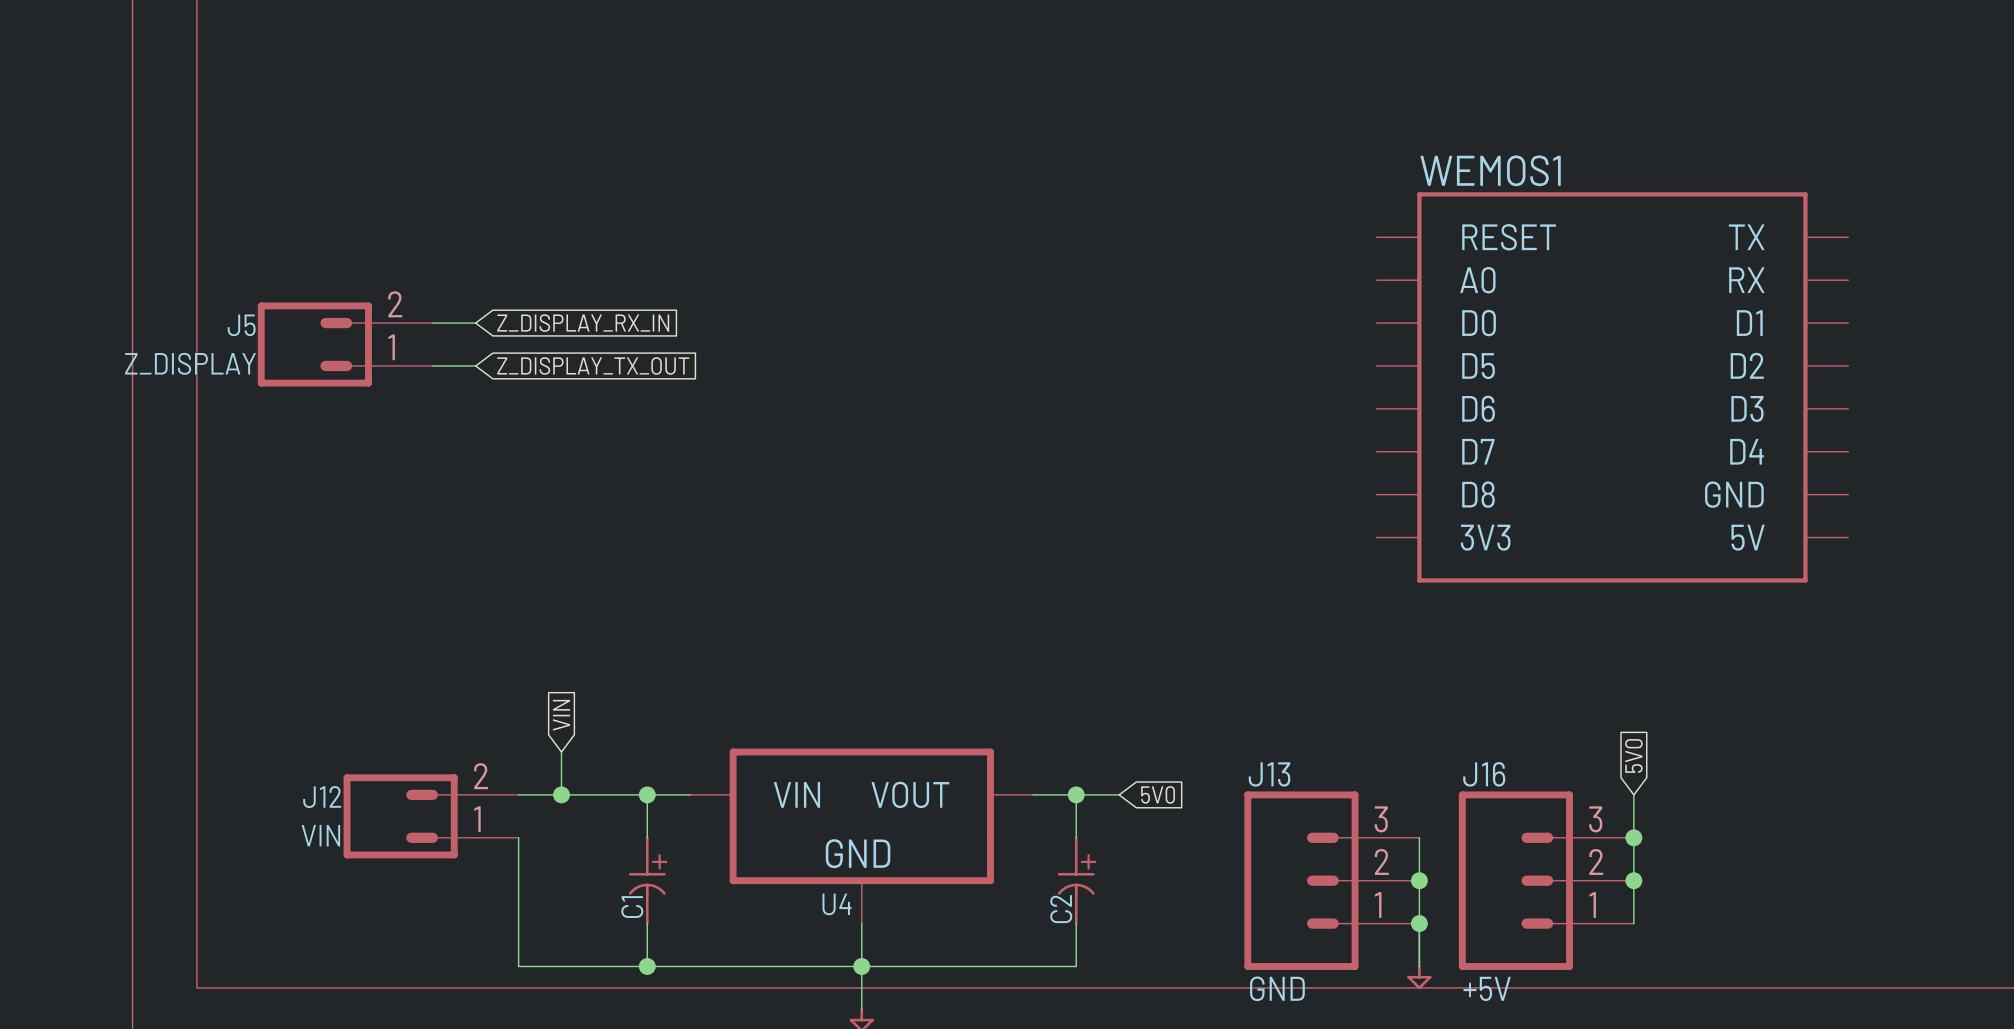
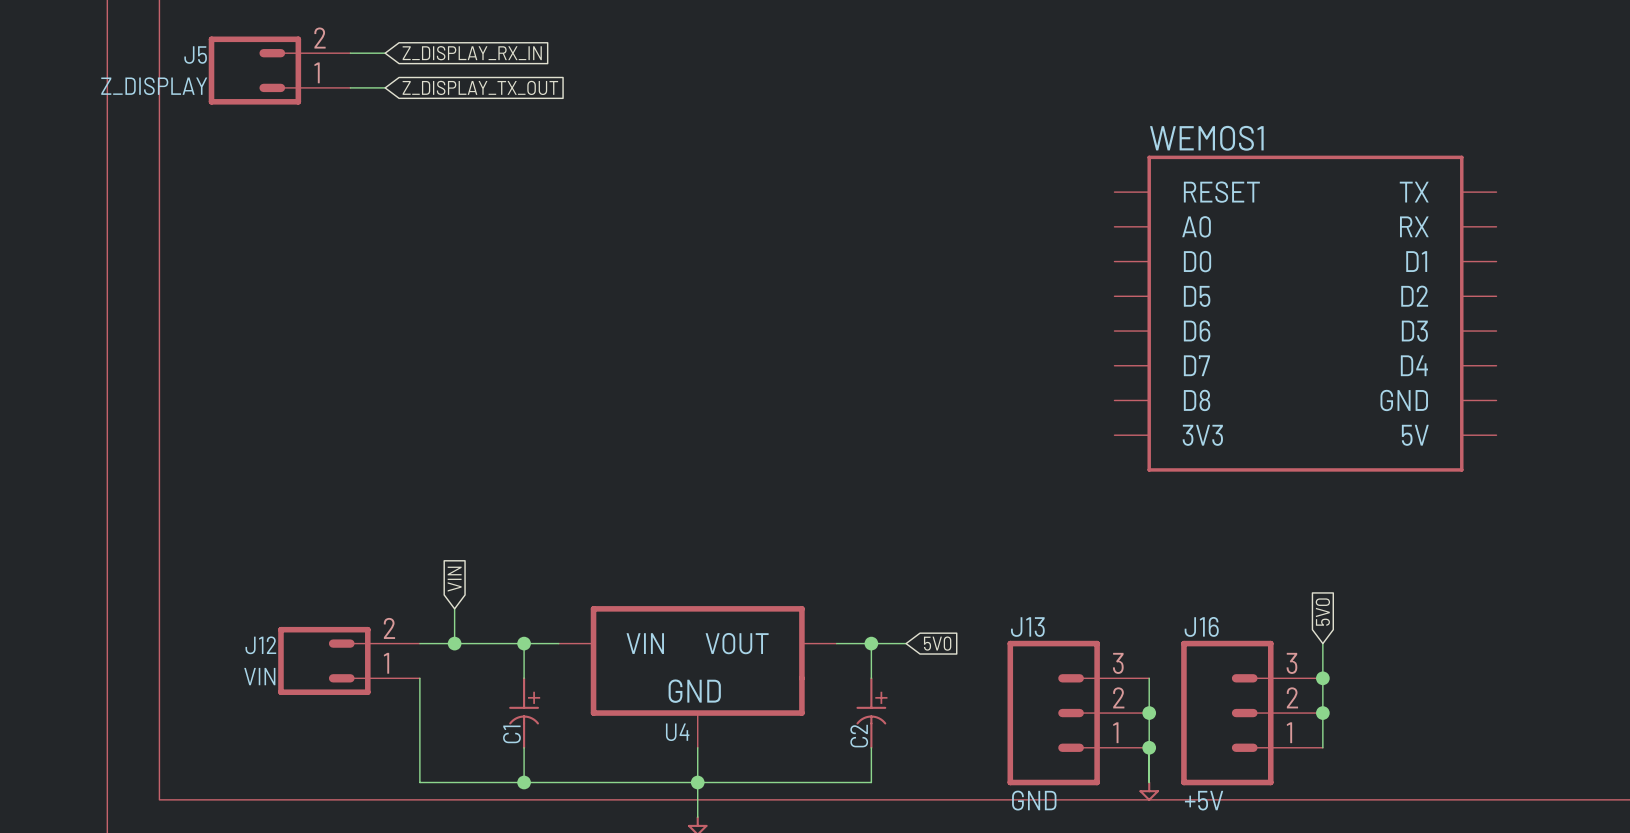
wire: (432, 323) (475, 323) -> (350, 87) (385, 87)
global label position: Z_DISPLAY_RX_IN (583, 323) -> Z_DISPLAY_RX_IN (472, 53)
J5 position: (345, 344) -> (279, 70)
wire: (432, 365) (475, 365) -> (350, 53) (385, 53)
global label position: Z_DISPLAY_TX_OUT (593, 365) -> Z_DISPLAY_TX_OUT (480, 87)

